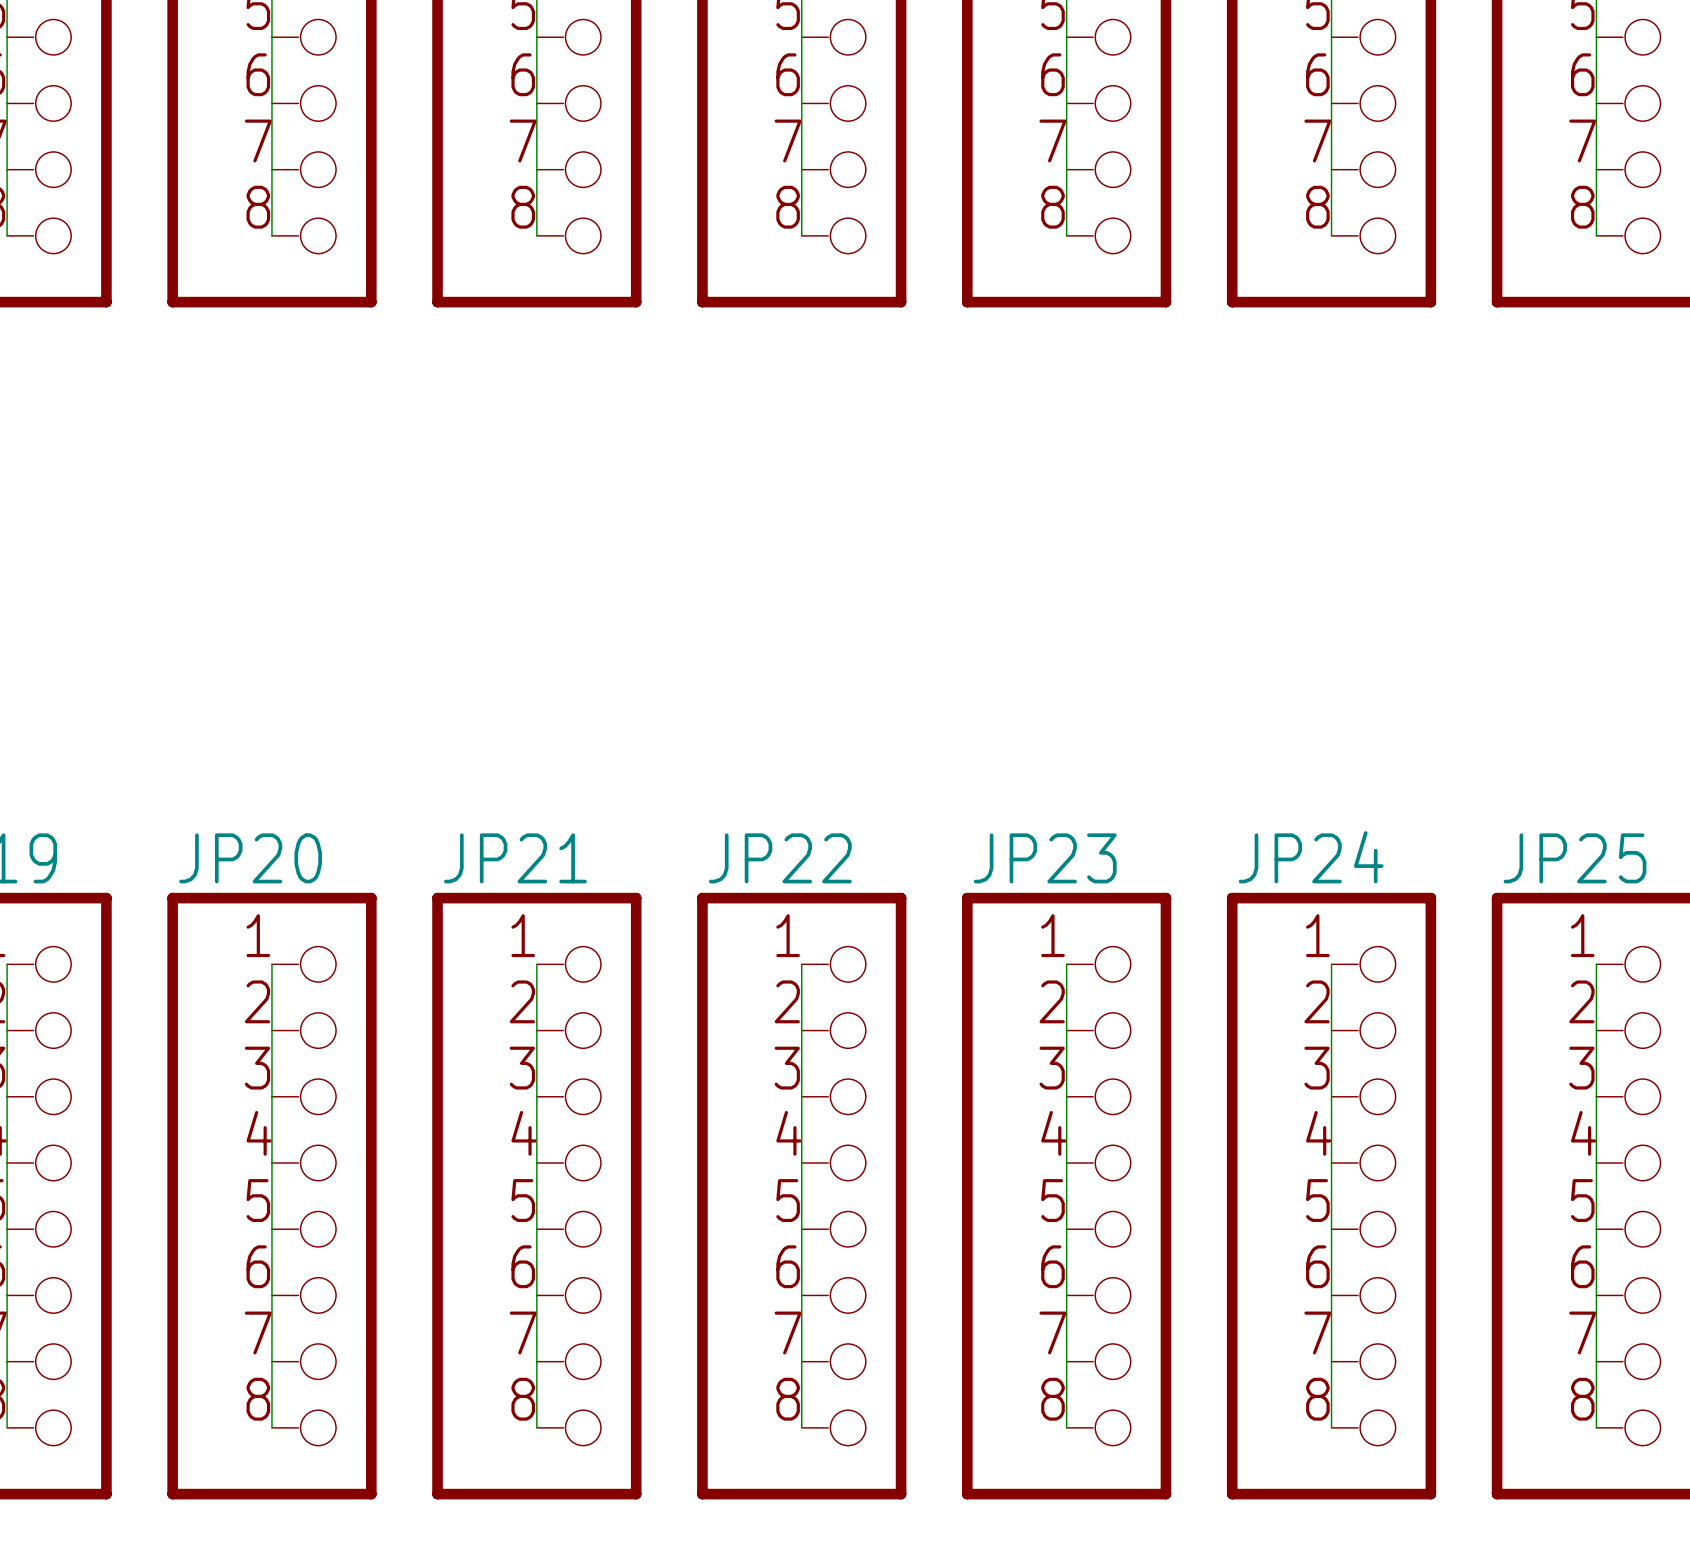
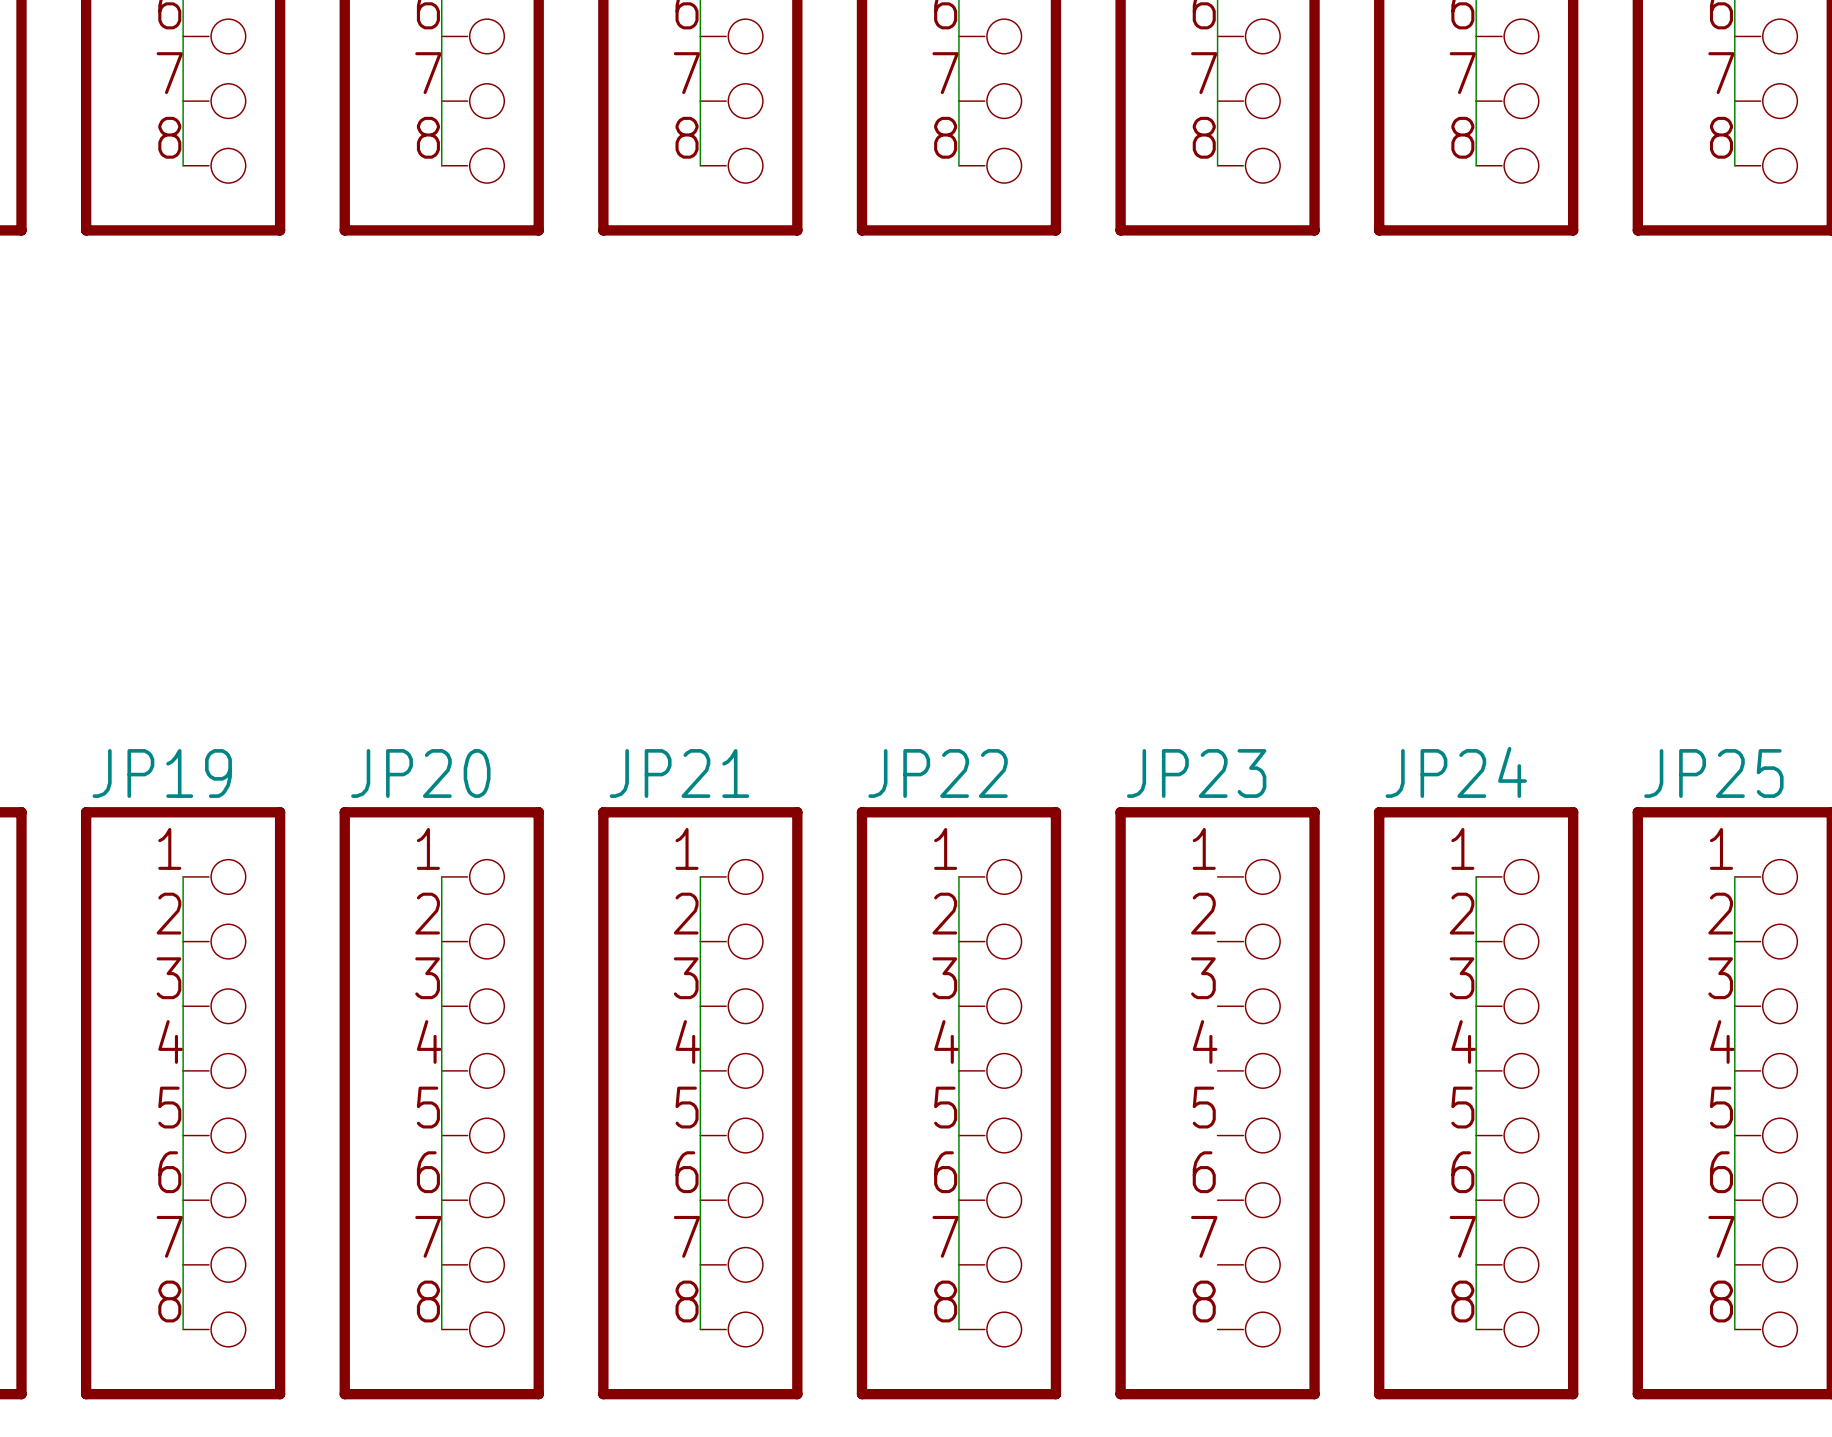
wire: (1066, 964) (1066, 1427) -> none

